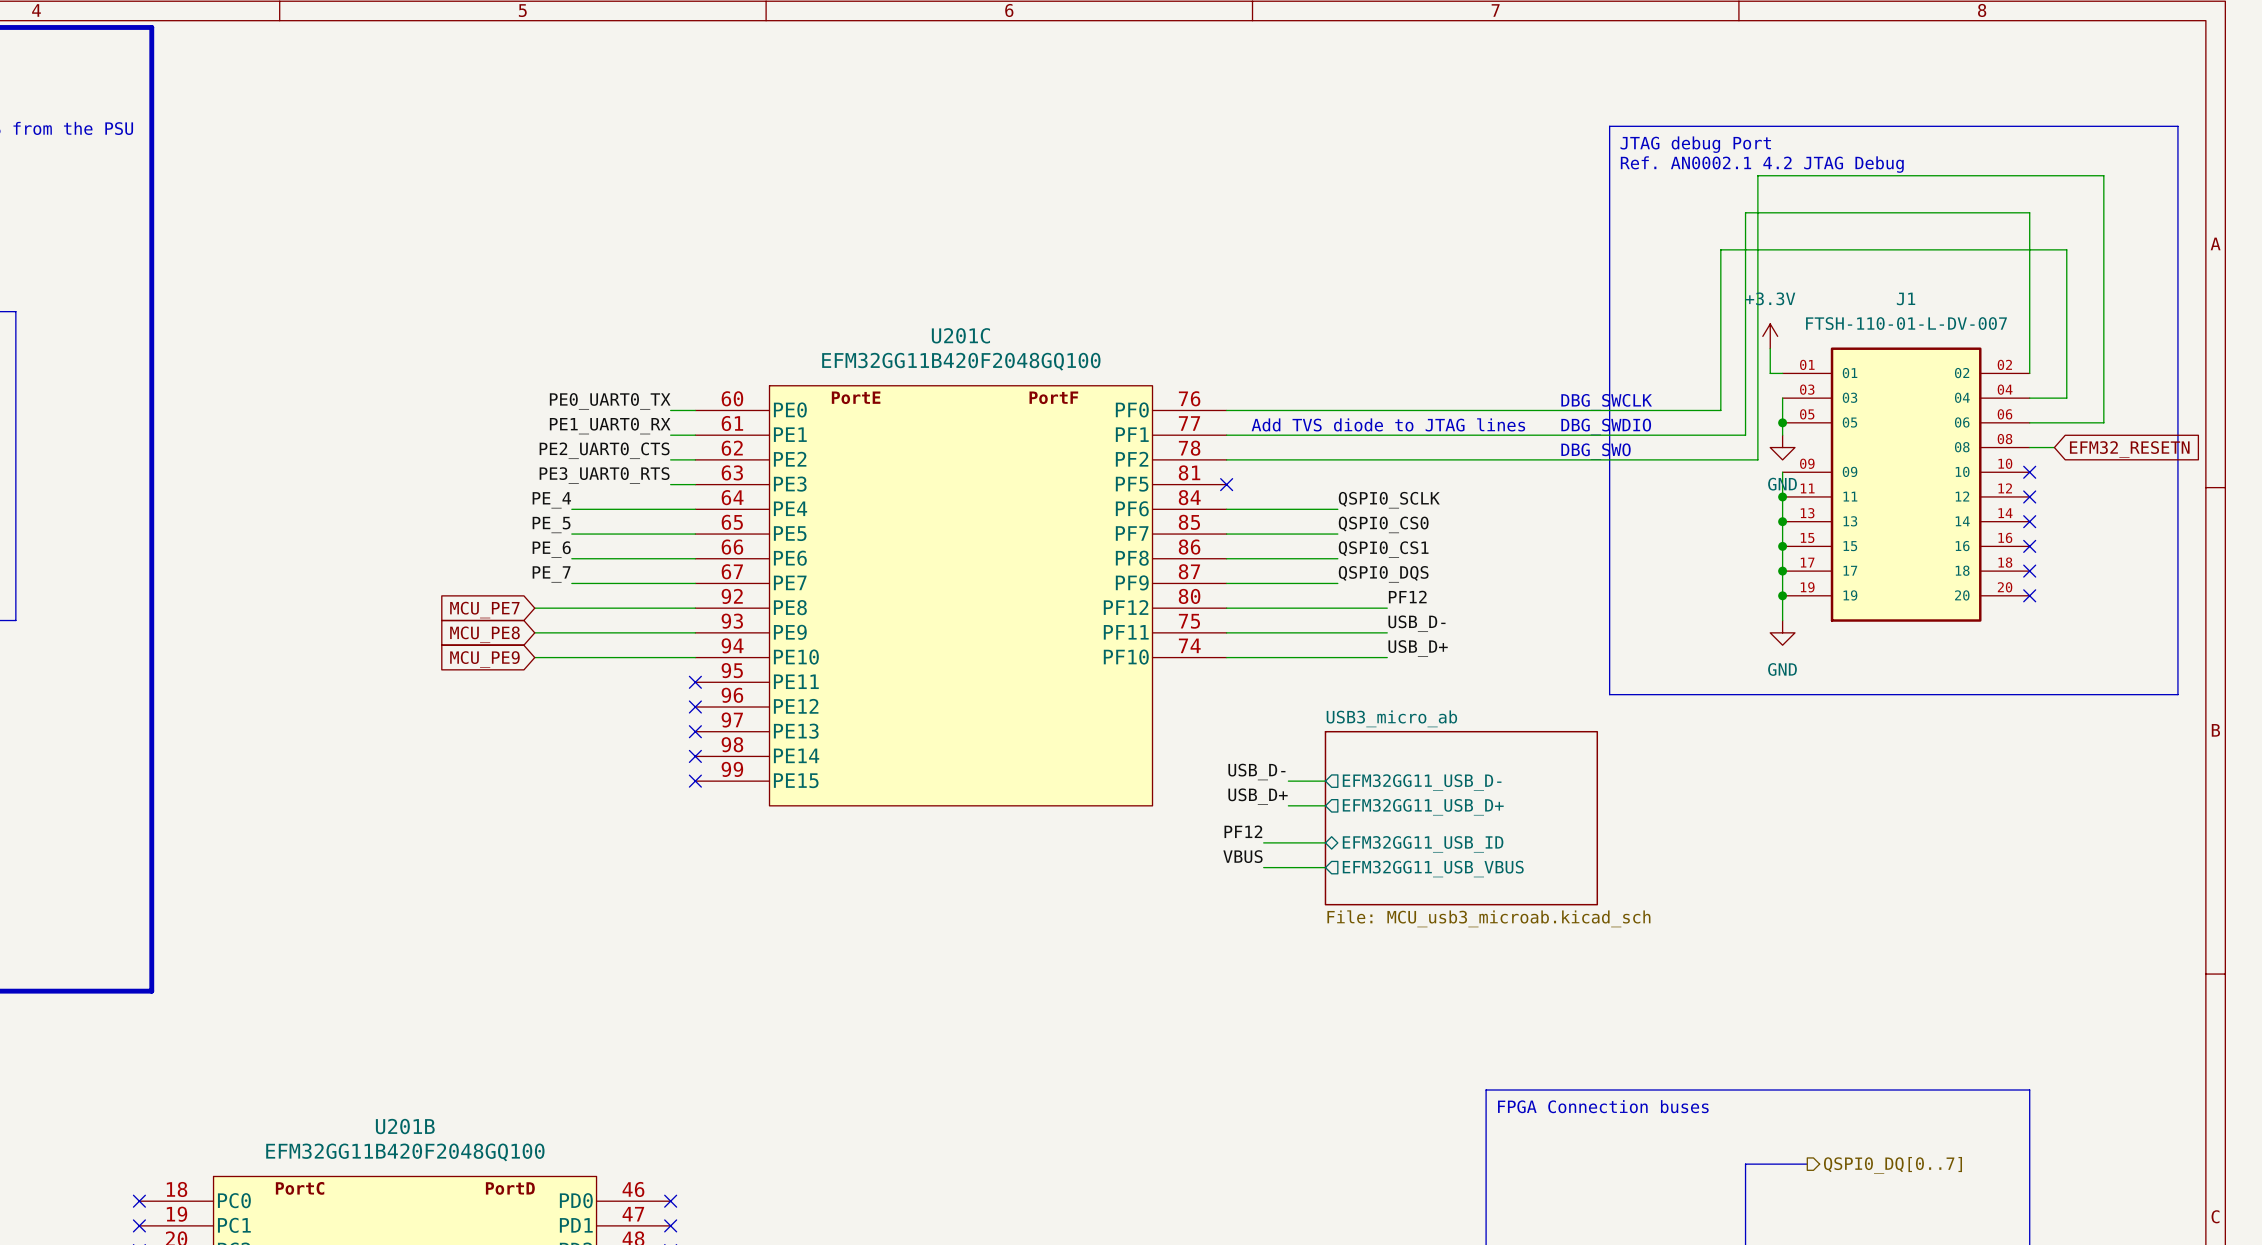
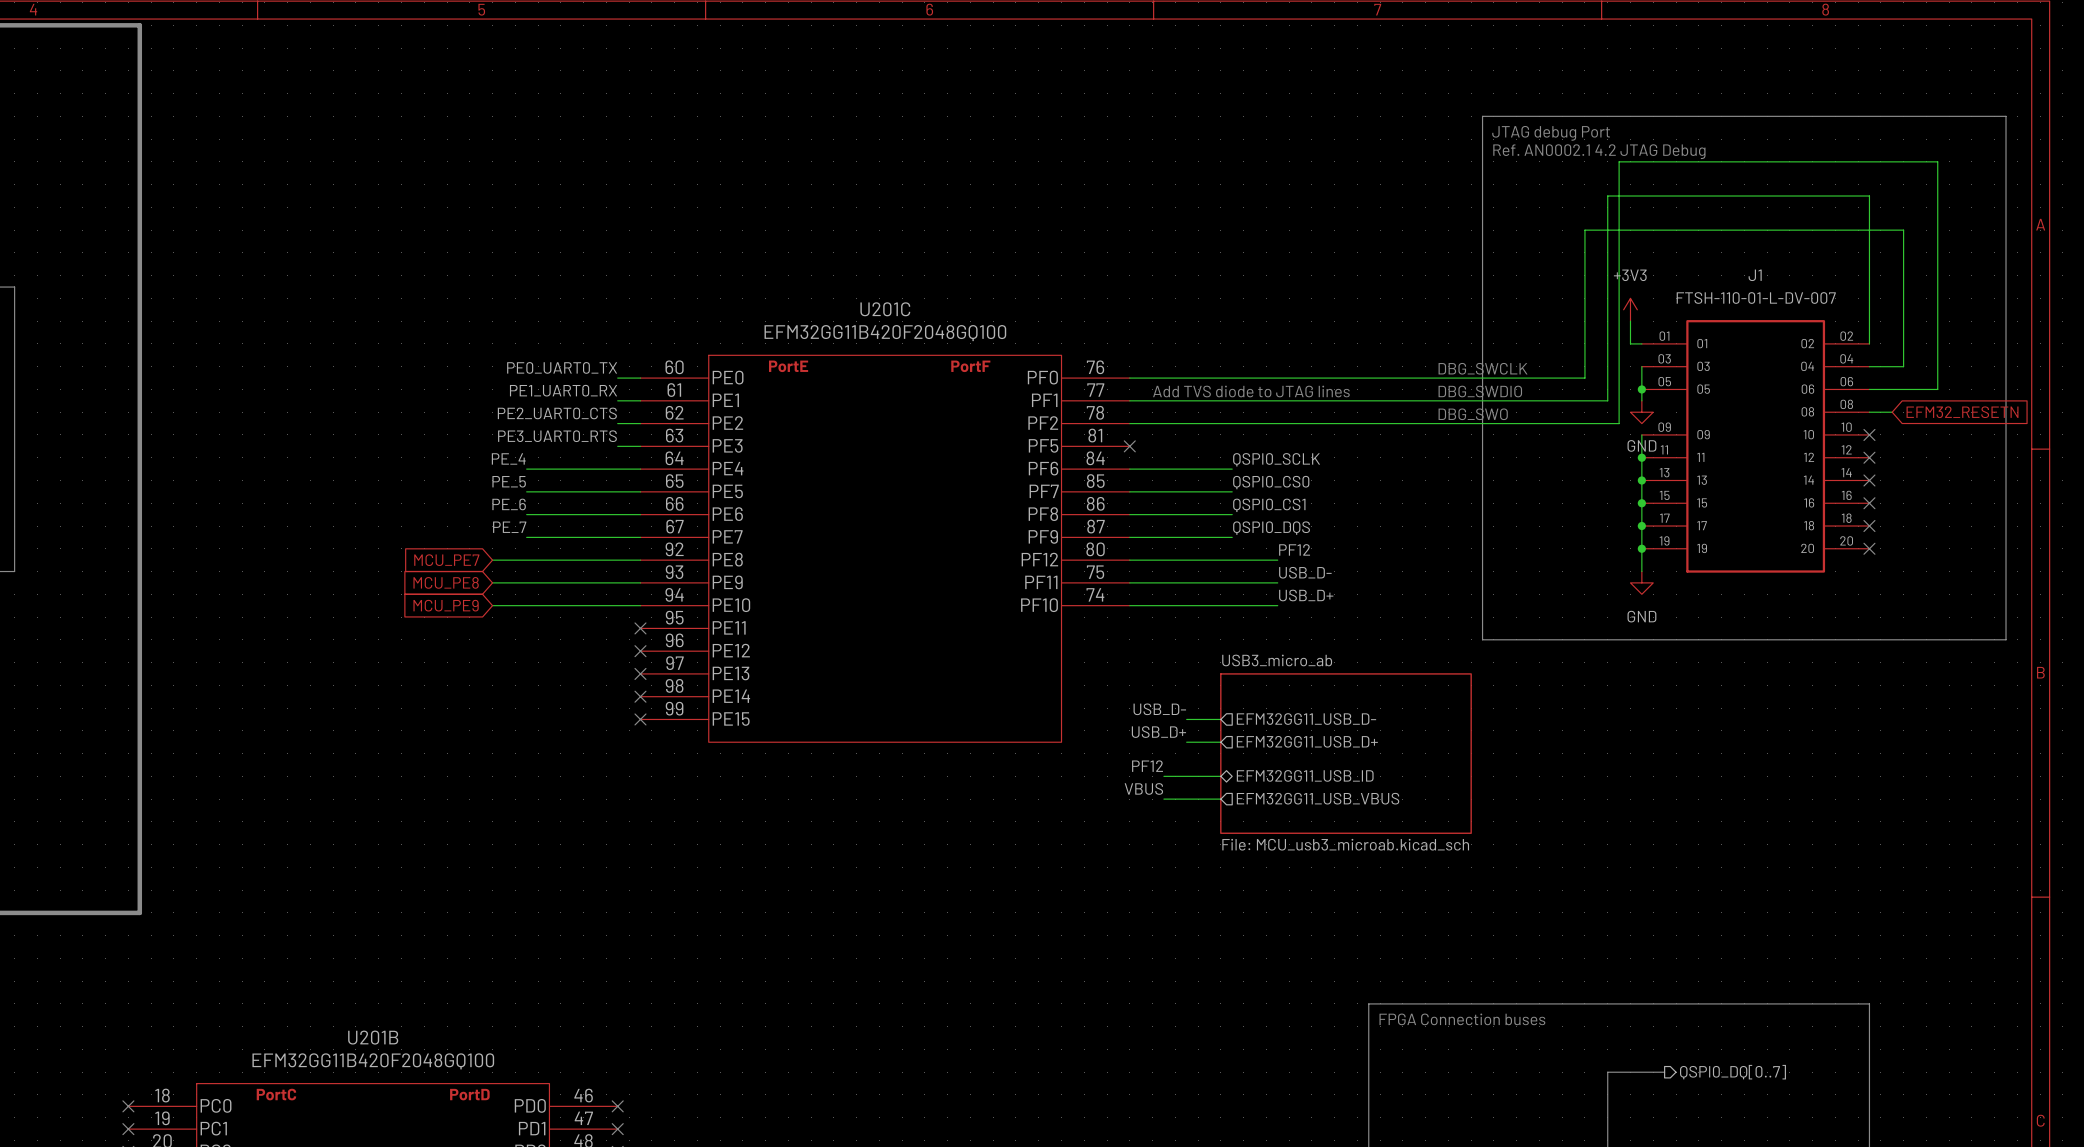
power symbol: +3.3V (1770, 336) -> +3V3 (1630, 309)

